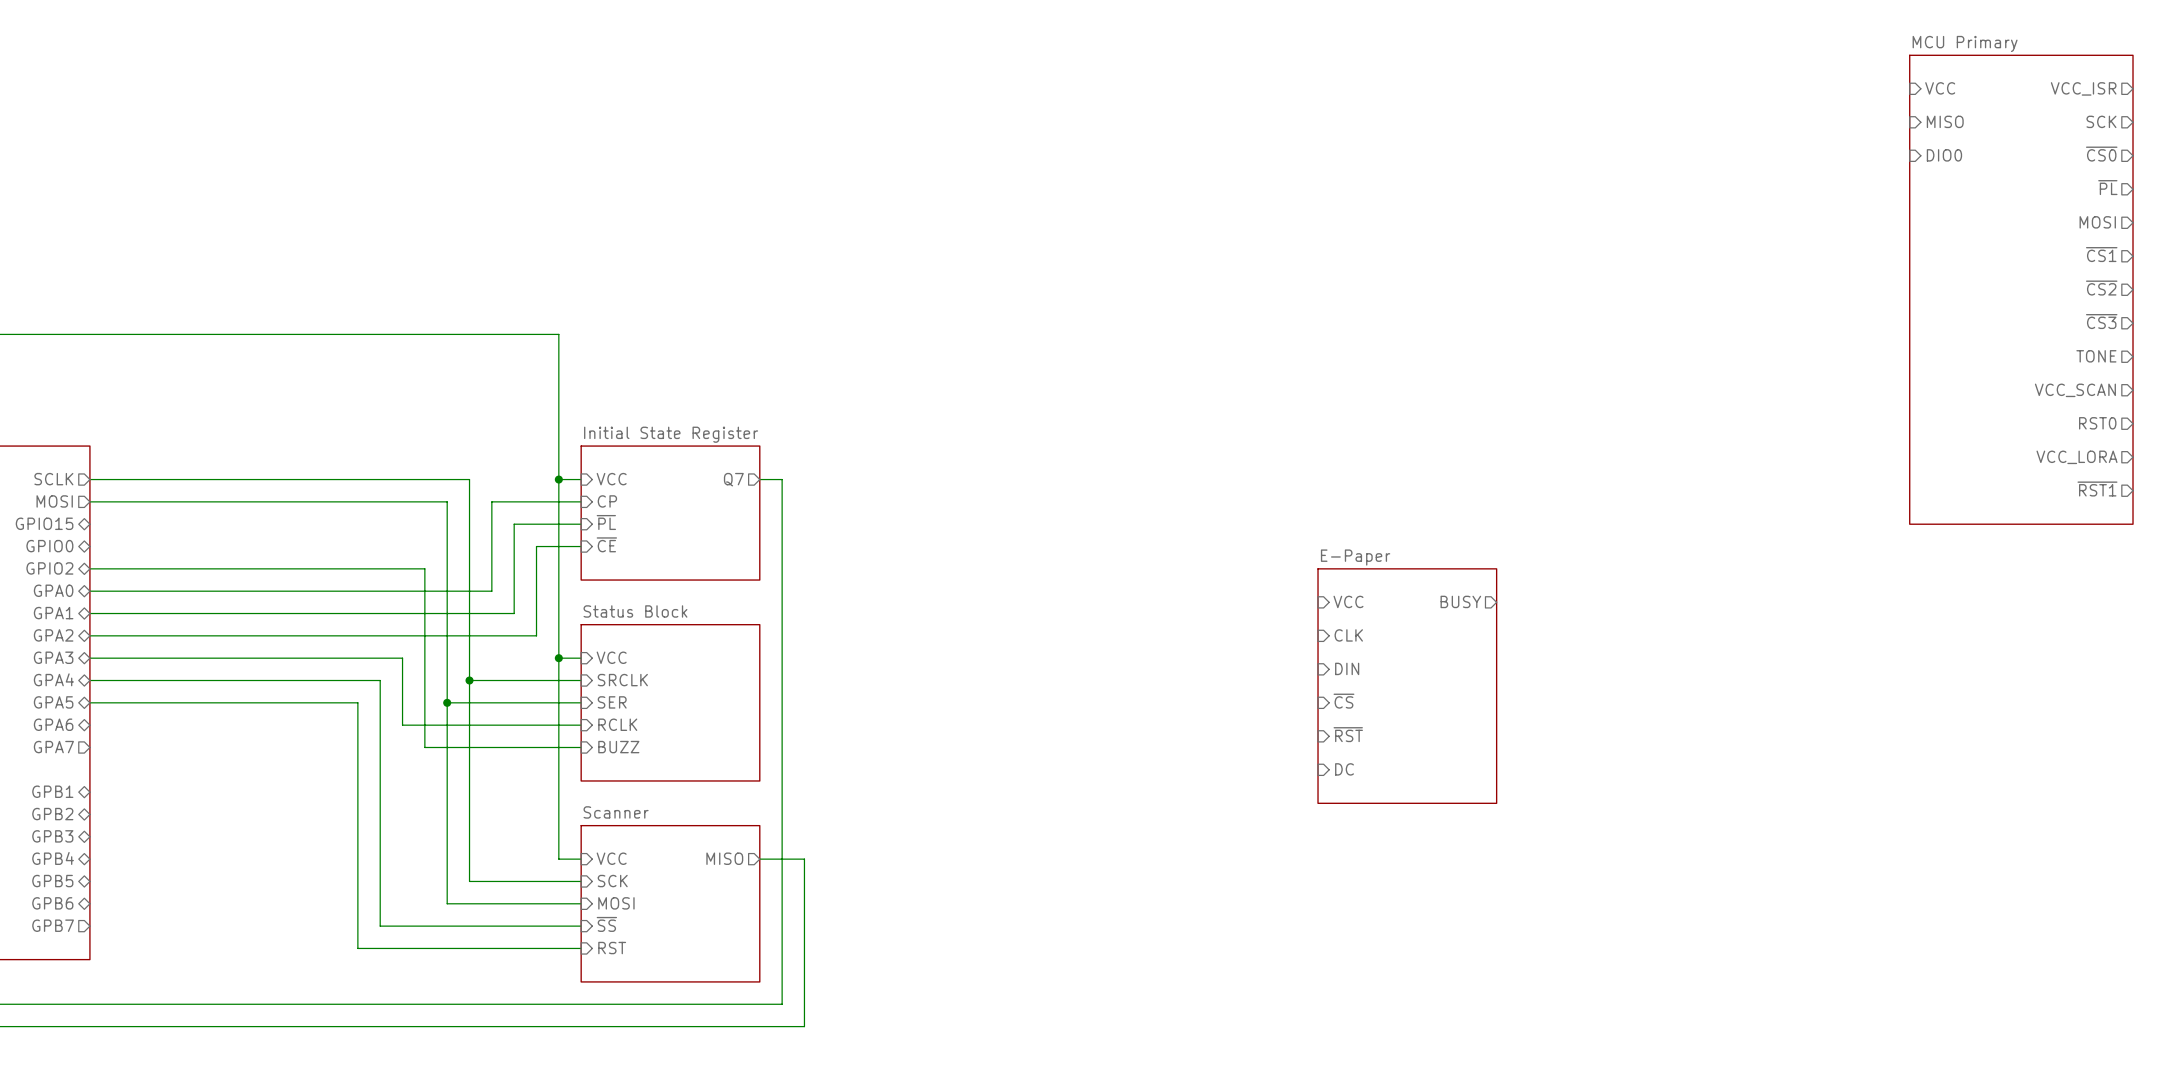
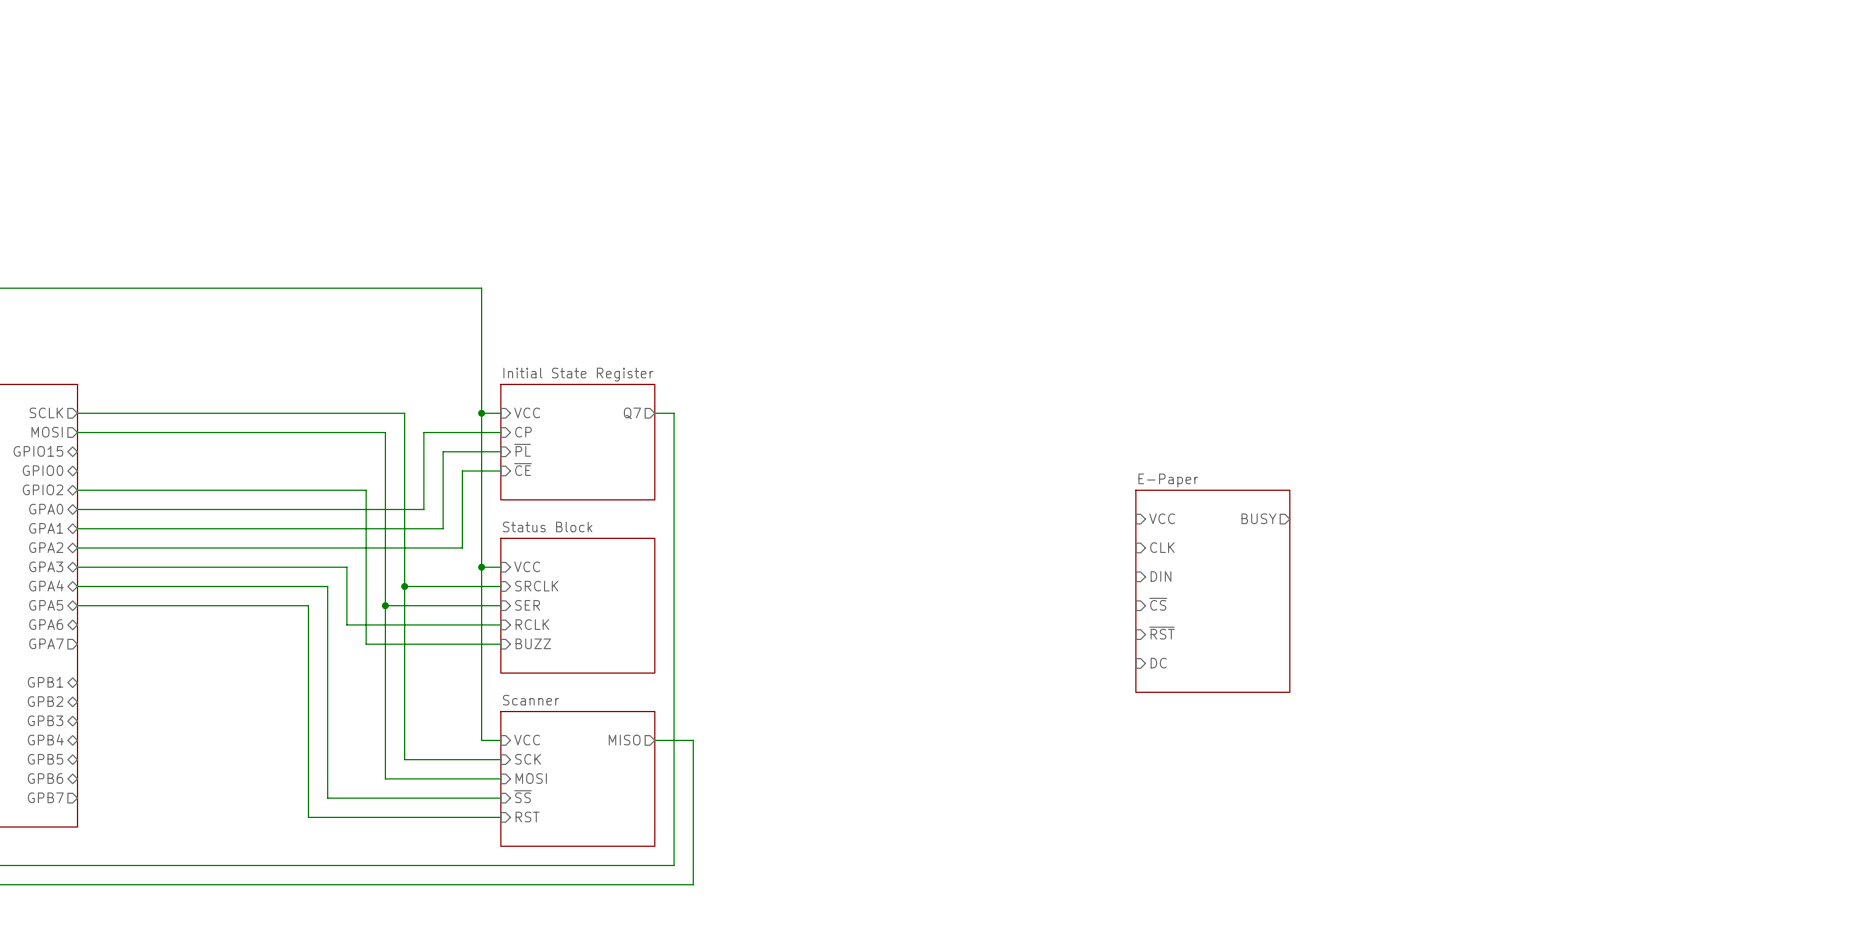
sheet pin: VCC (1940, 88) -> none
sheet pin: VCC_ISR (2083, 88) -> none
sheet pin: MISO (1945, 121) -> none
sheet pin: SCK (2101, 121) -> none
sheet pin: ~{CS0} (2101, 154) -> none
sheet pin: DIO0 (1944, 155) -> none
sheet pin: ~{PL} (2107, 187) -> none
sheet pin: MOSI (2097, 222) -> none
sheet pin: ~{CS1} (2101, 254) -> none
sheet pin: ~{CS2} (2101, 288) -> none
sheet MCU Primary: (2021, 289) -> none
sheet pin: ~{CS3} (2101, 321) -> none
sheet pin: TONE (2096, 356) -> none
sheet pin: VCC_SCAN (2075, 390) -> none
sheet pin: RST0 (2097, 423) -> none
sheet pin: VCC_LORA (2077, 457) -> none
sheet pin: ~{RST1} (2097, 489) -> none

